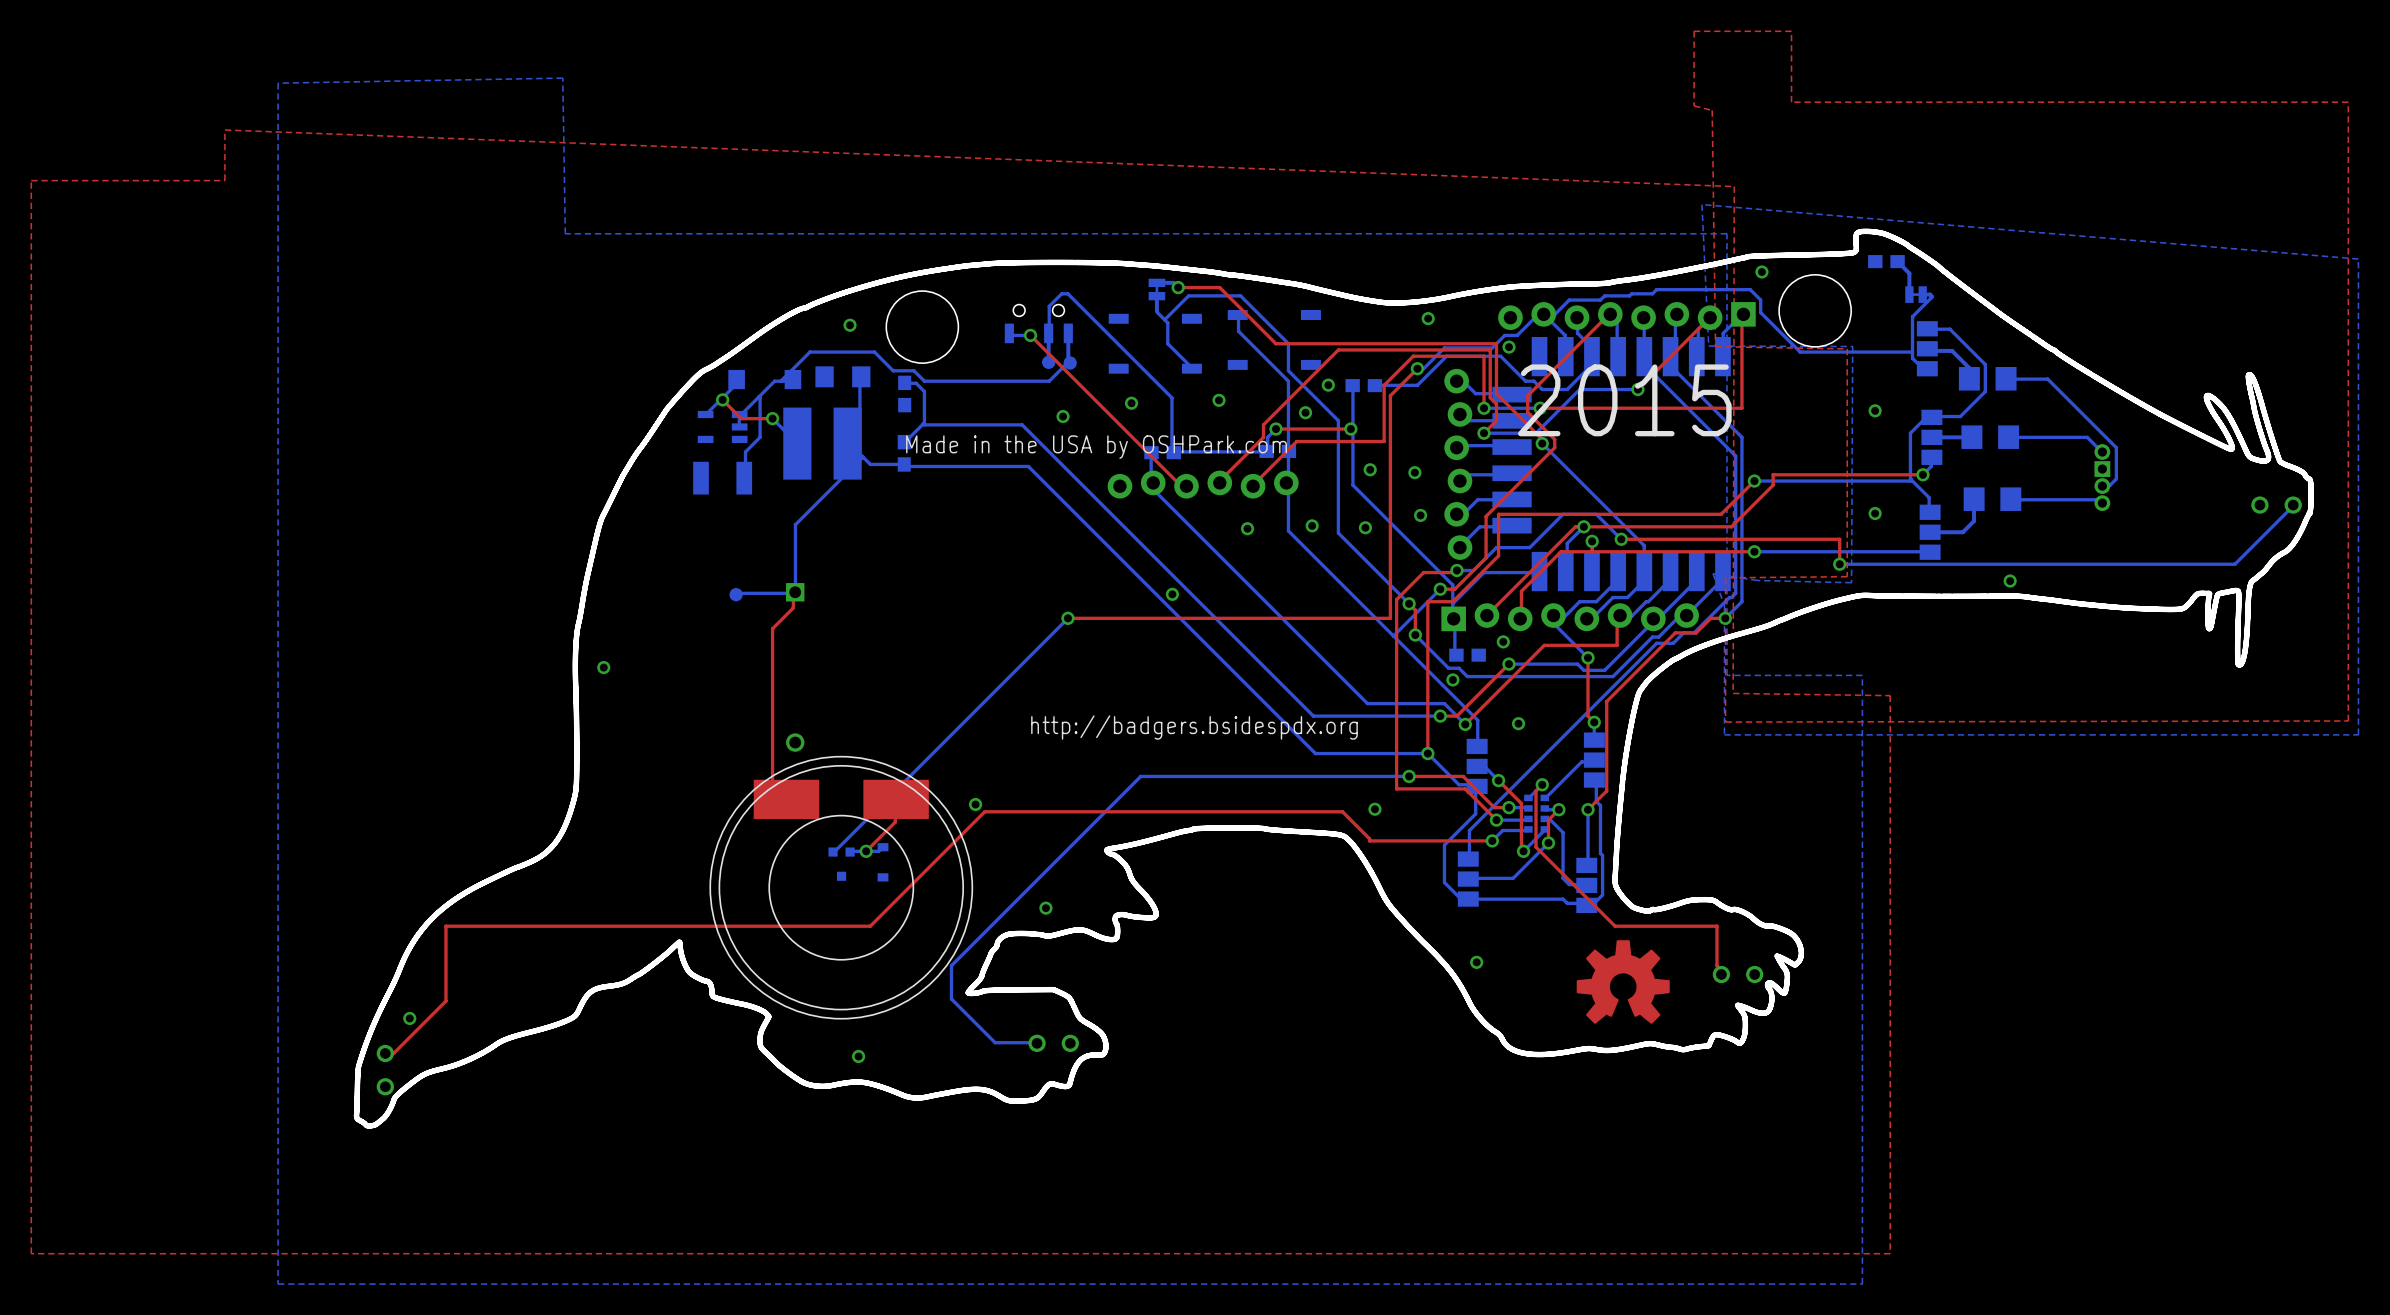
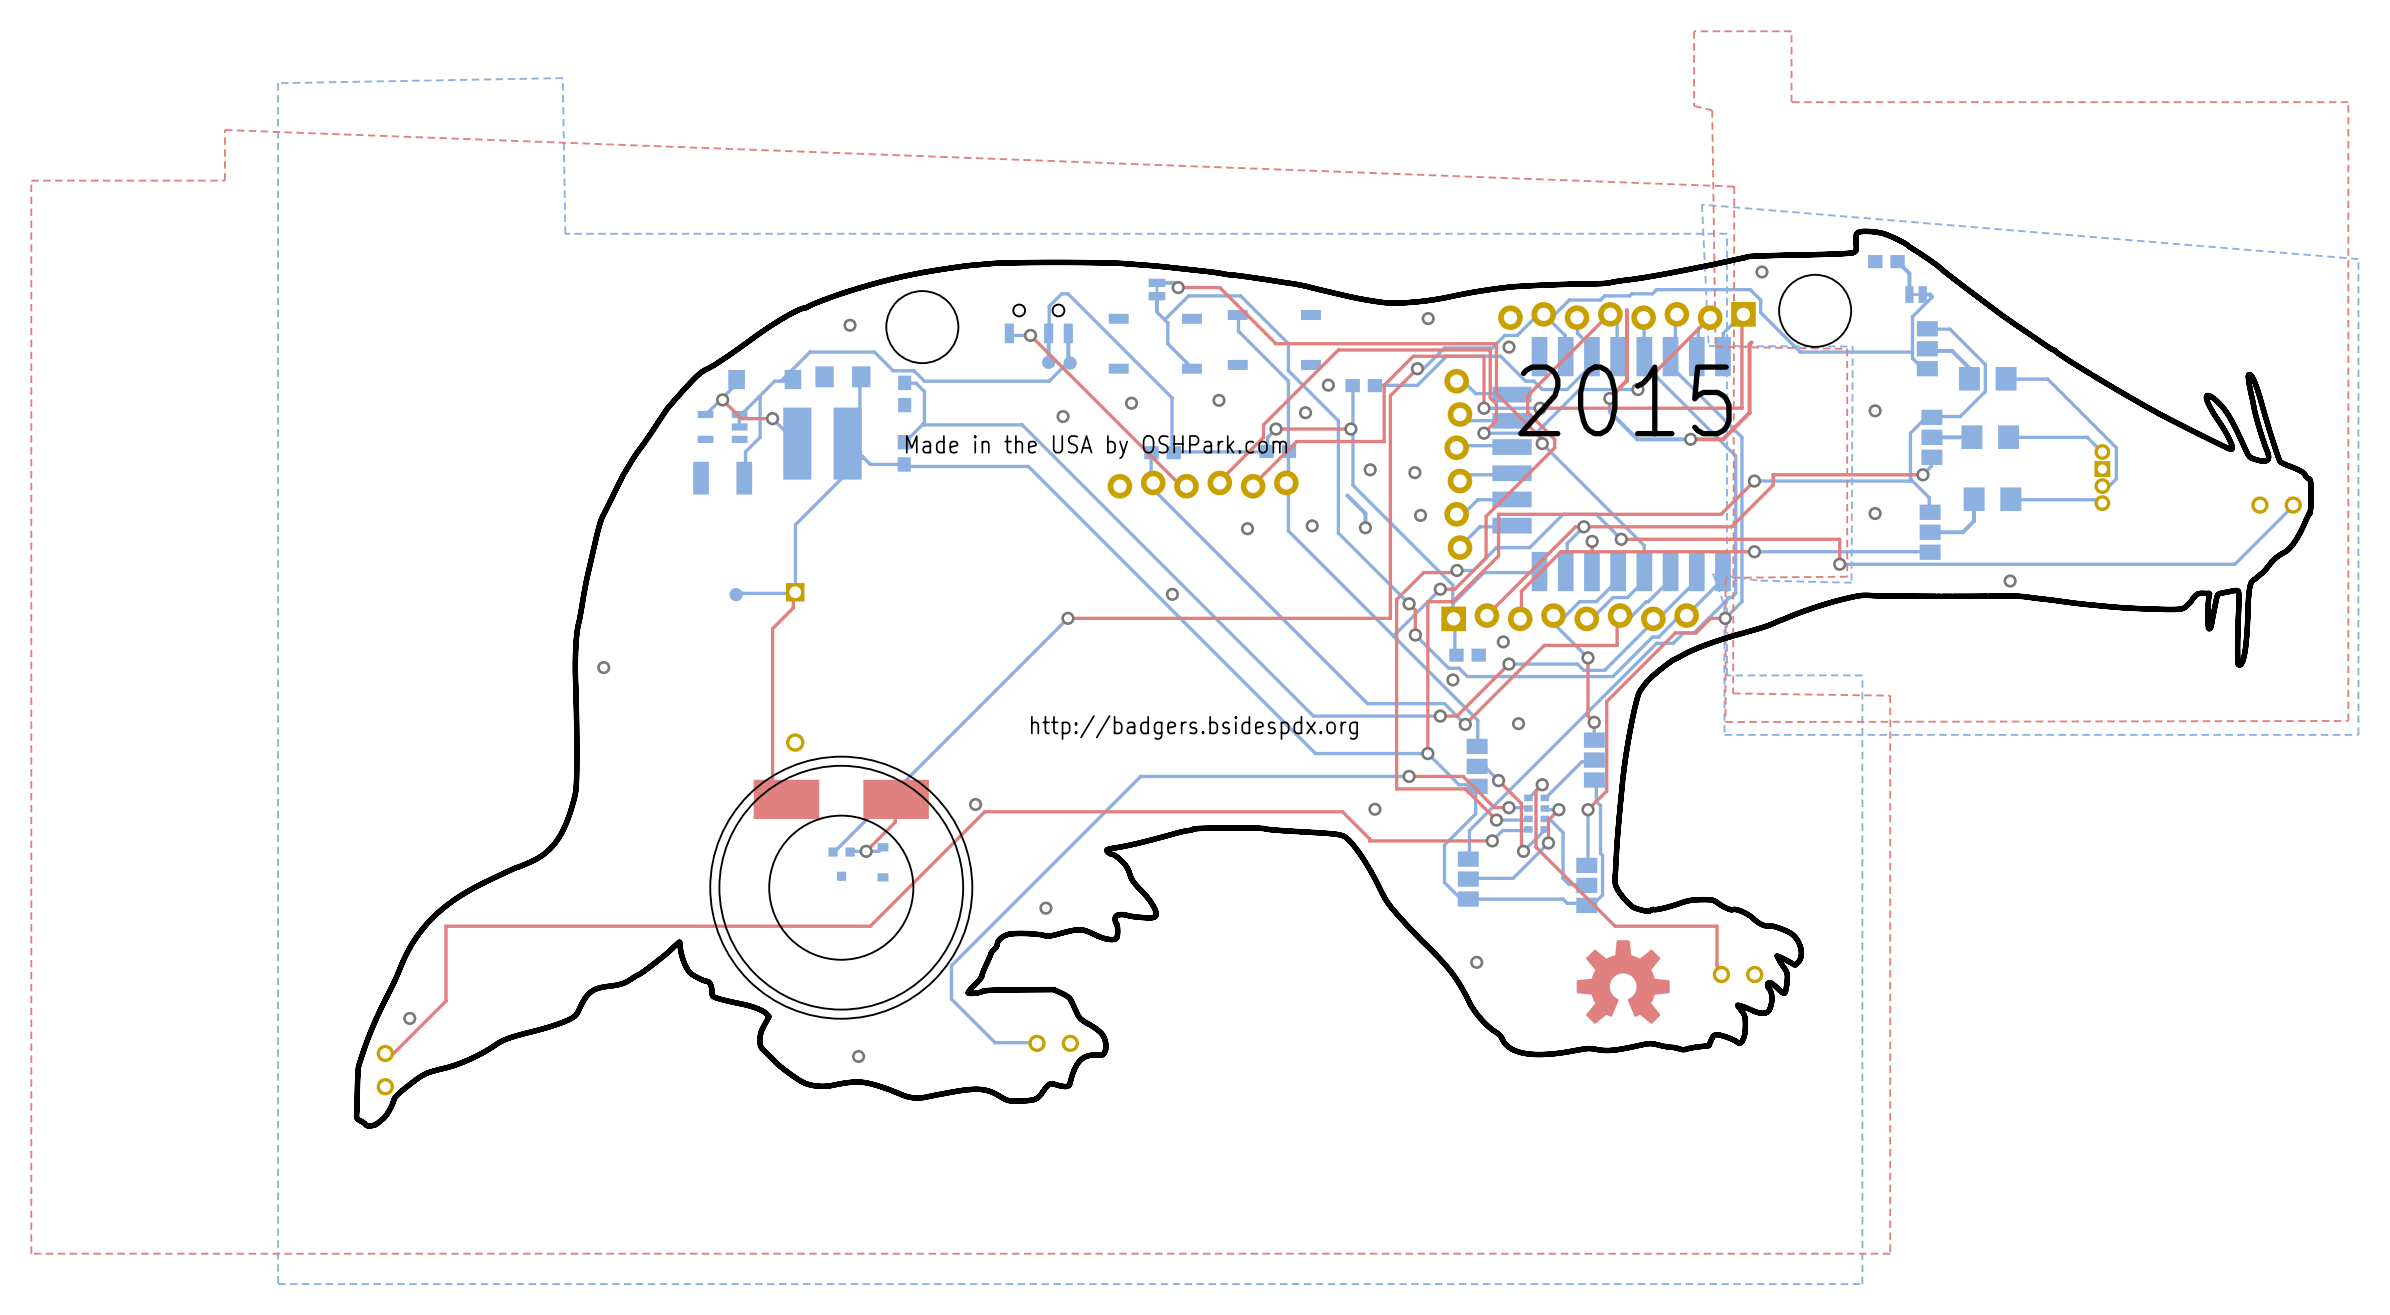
top track: none -> (1626, 310) (1626, 380) (1609, 398)
top track: none -> (1751, 342) (1749, 344) (1749, 412) (1722, 439) (1690, 439)
bottom track: none -> (1609, 398) (1609, 411) (1637, 439) (1690, 439)
via: none -> (1609, 398)
via: none -> (1690, 439)
bottom track: none -> (1347, 495) (1365, 513) (1365, 527)

